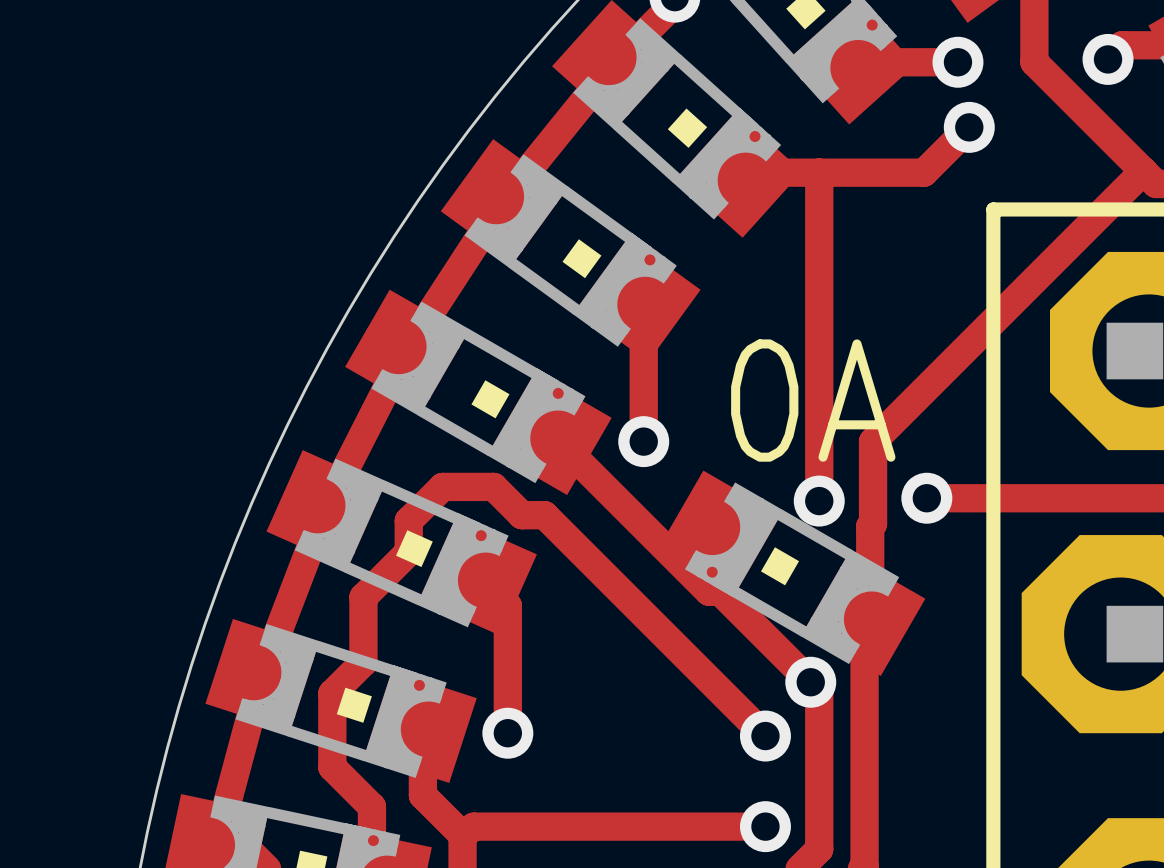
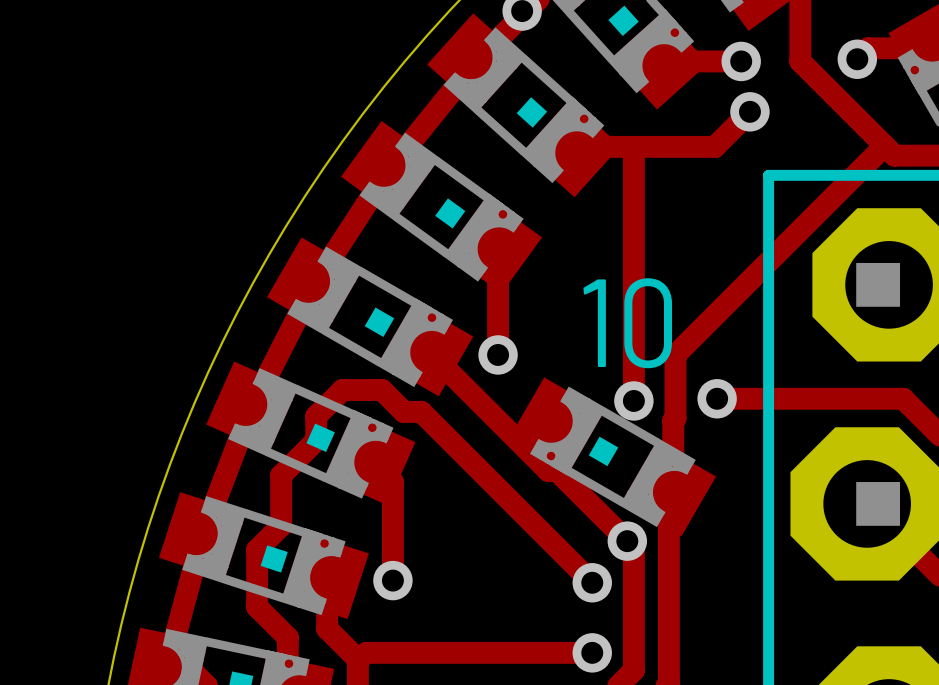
text: 0A (813, 400) -> 10 (627, 323)

